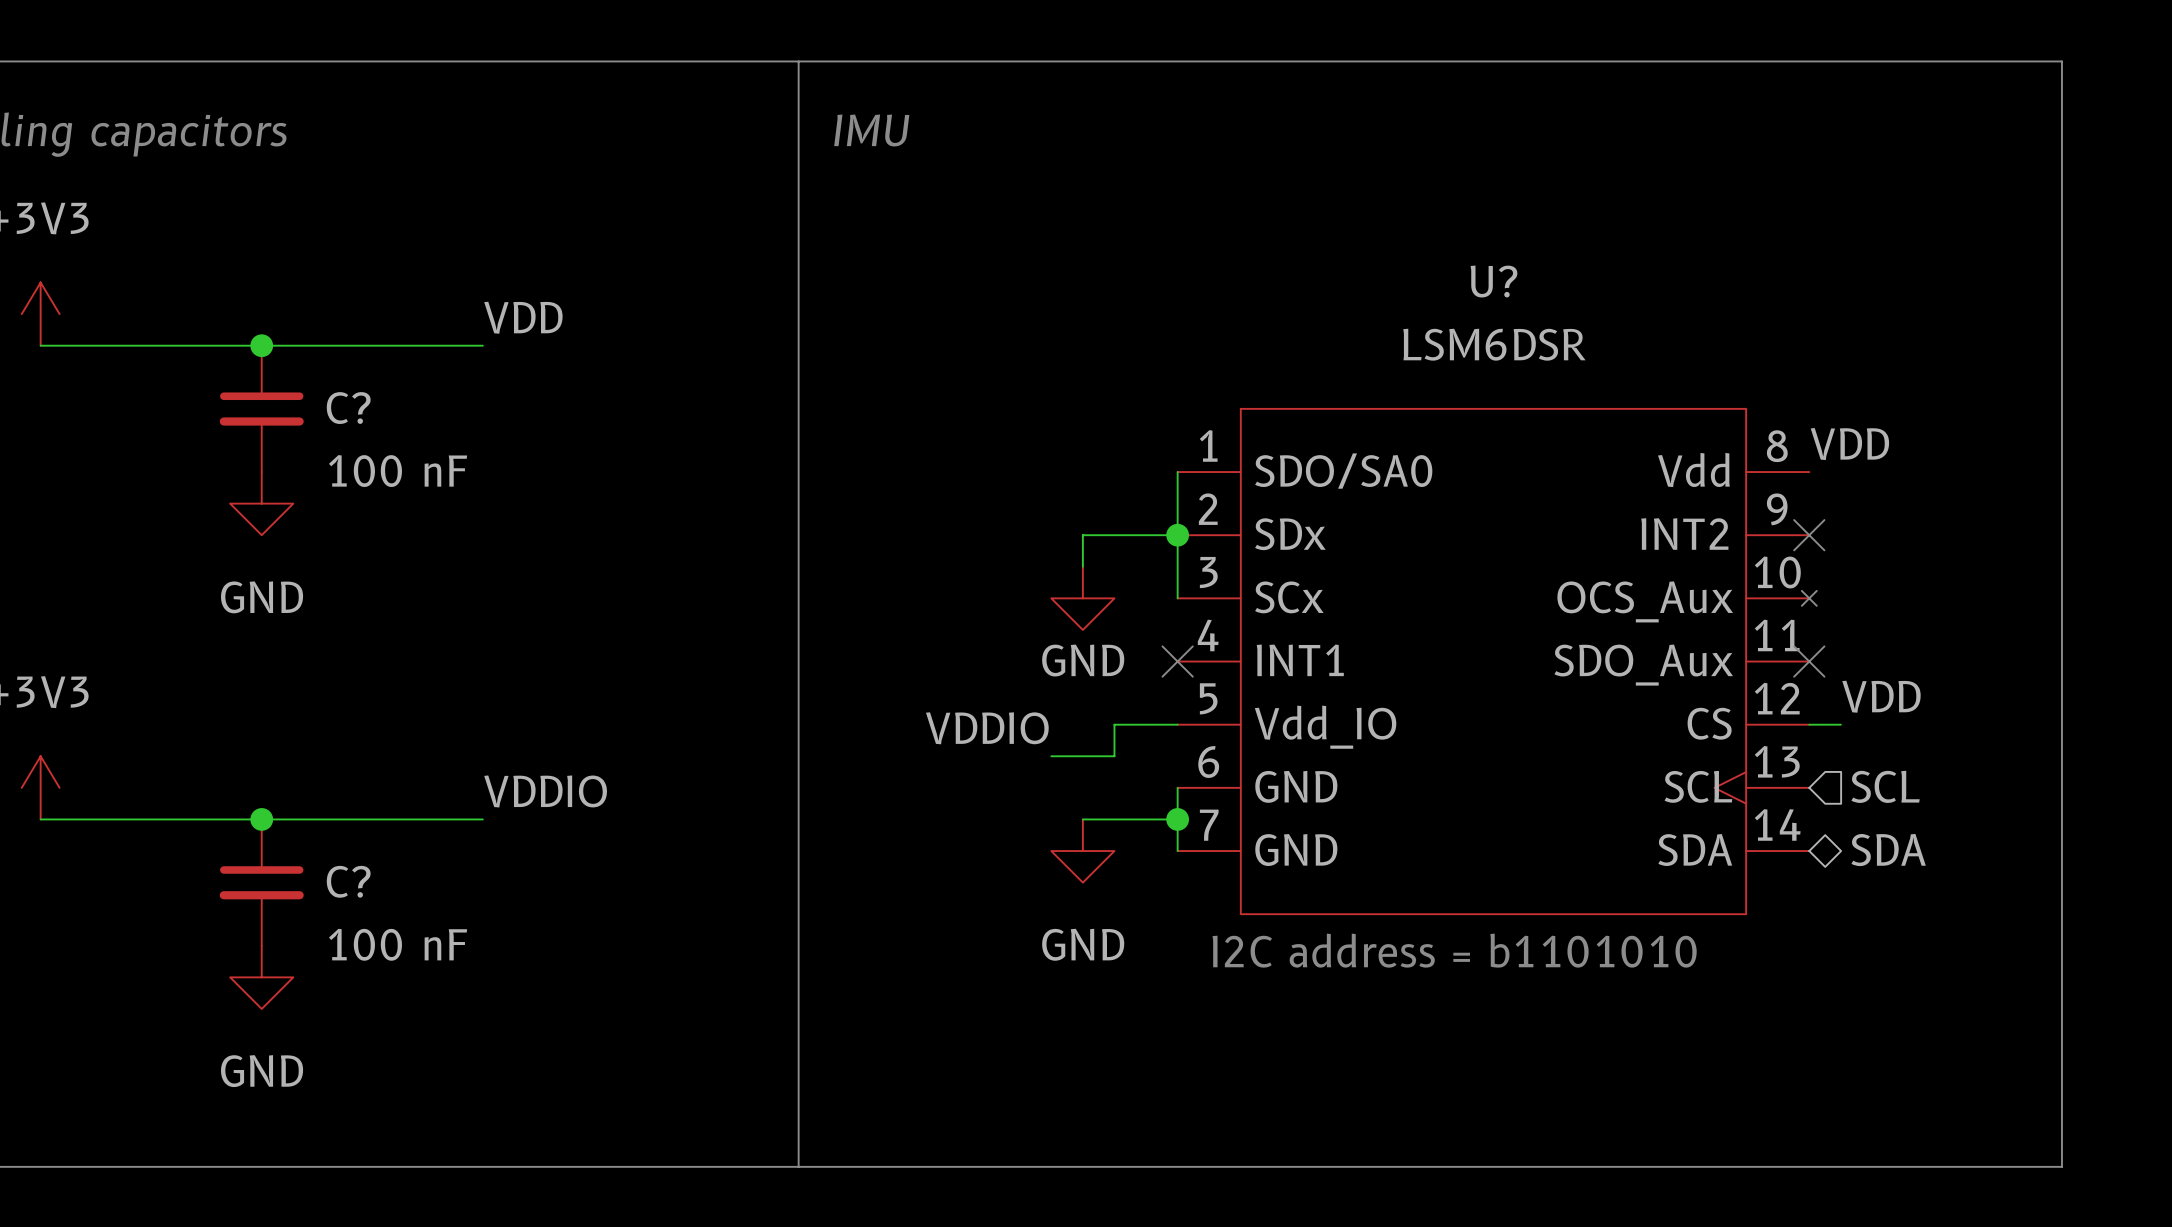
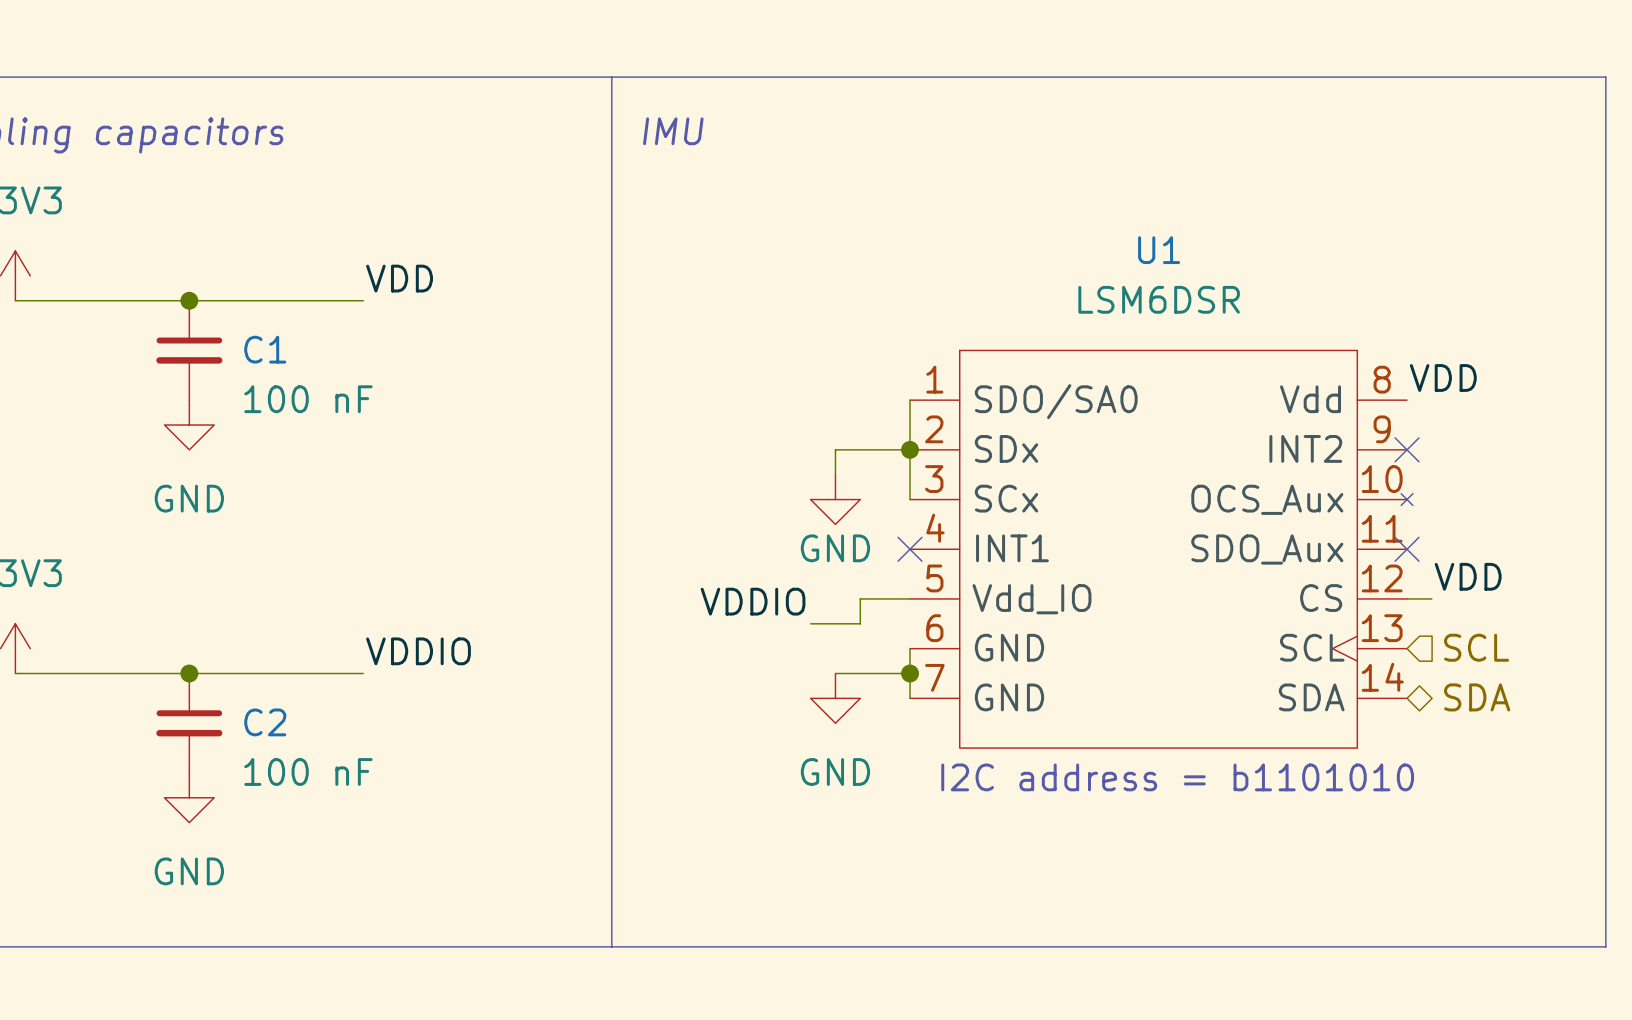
U? name: U? (1493, 281) -> U1 (1159, 250)
C? name: C? (348, 408) -> C1 (265, 349)
C? name: C? (348, 881) -> C2 (265, 722)

